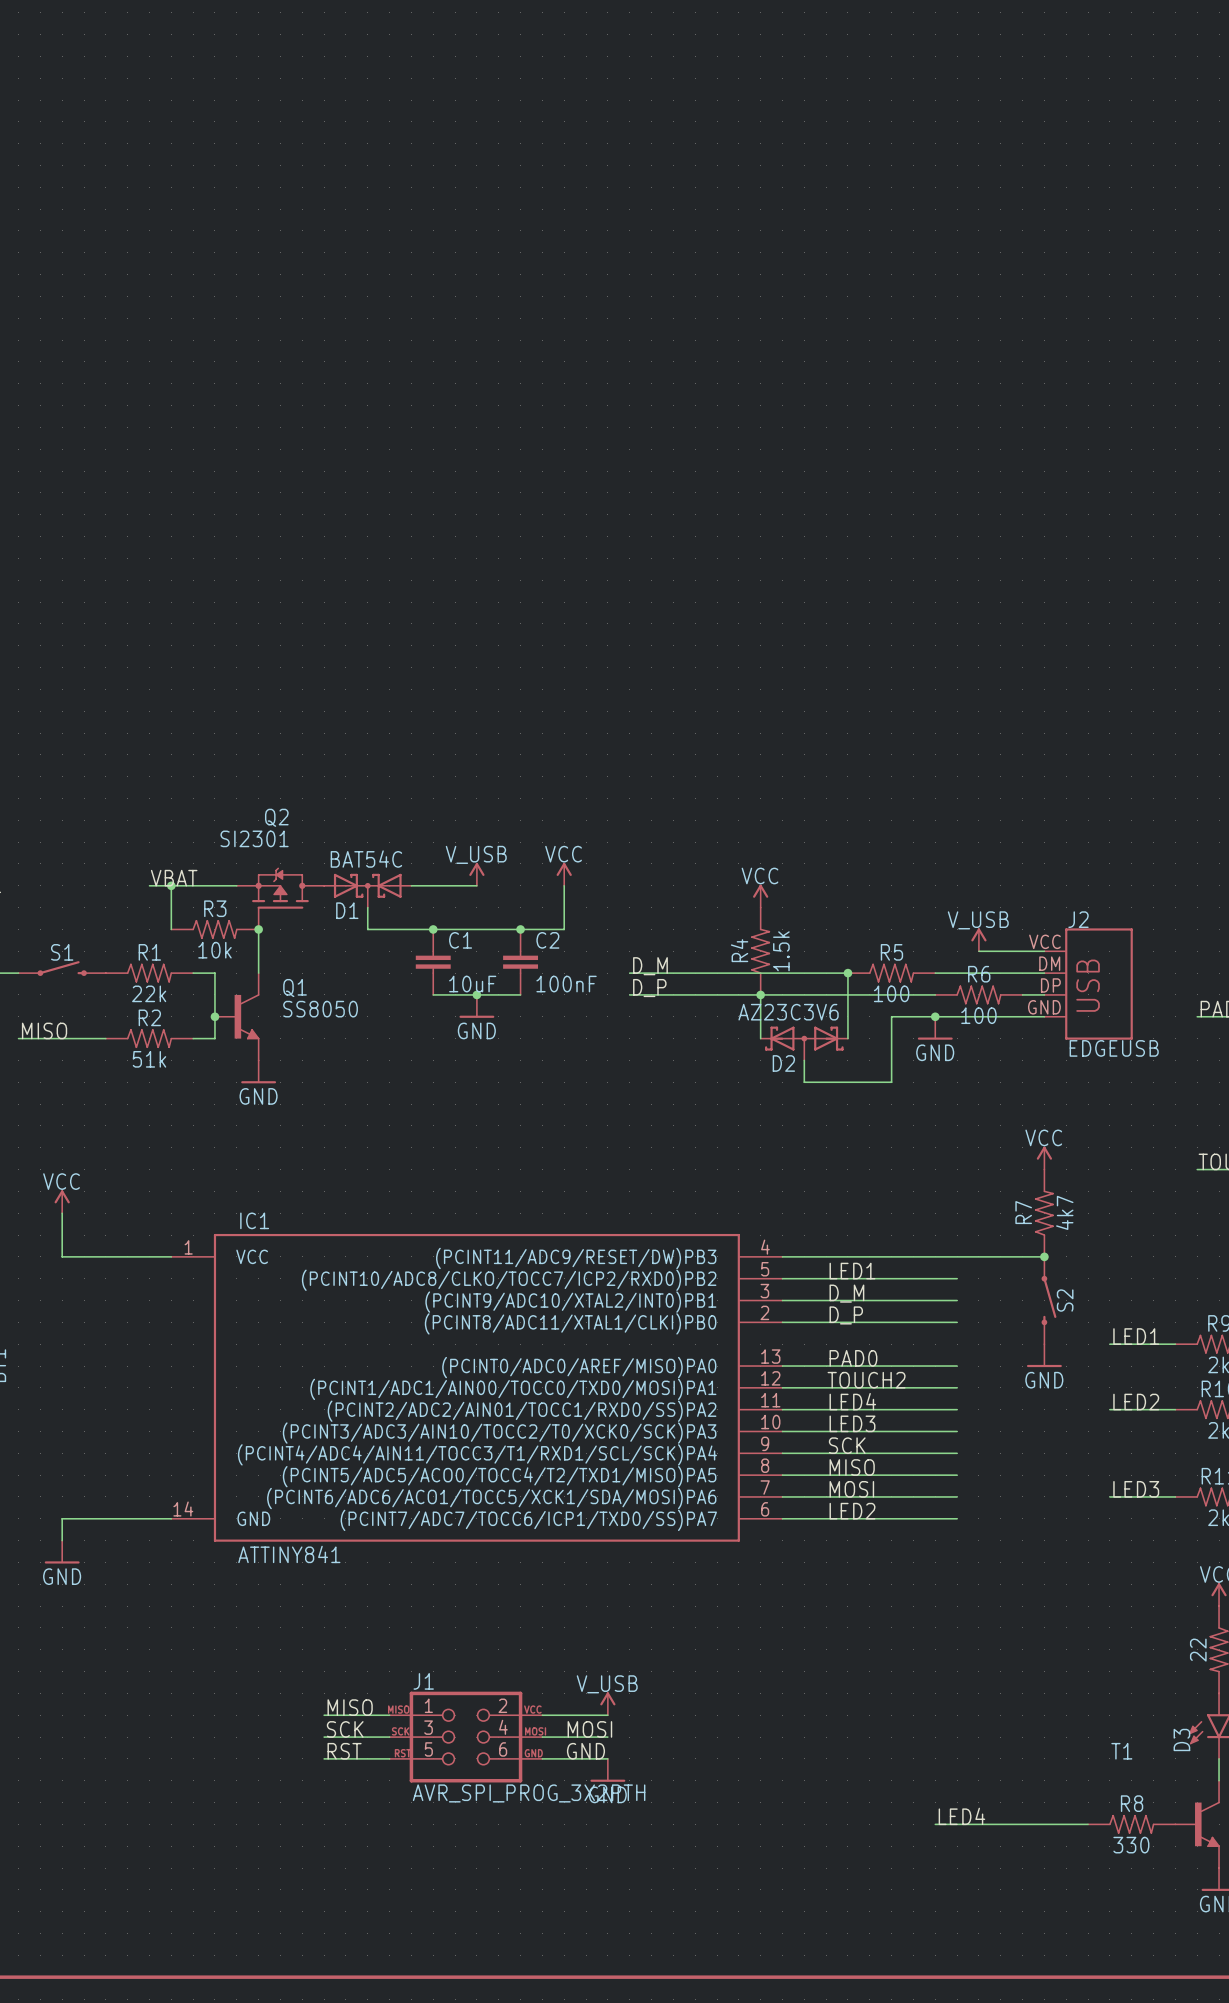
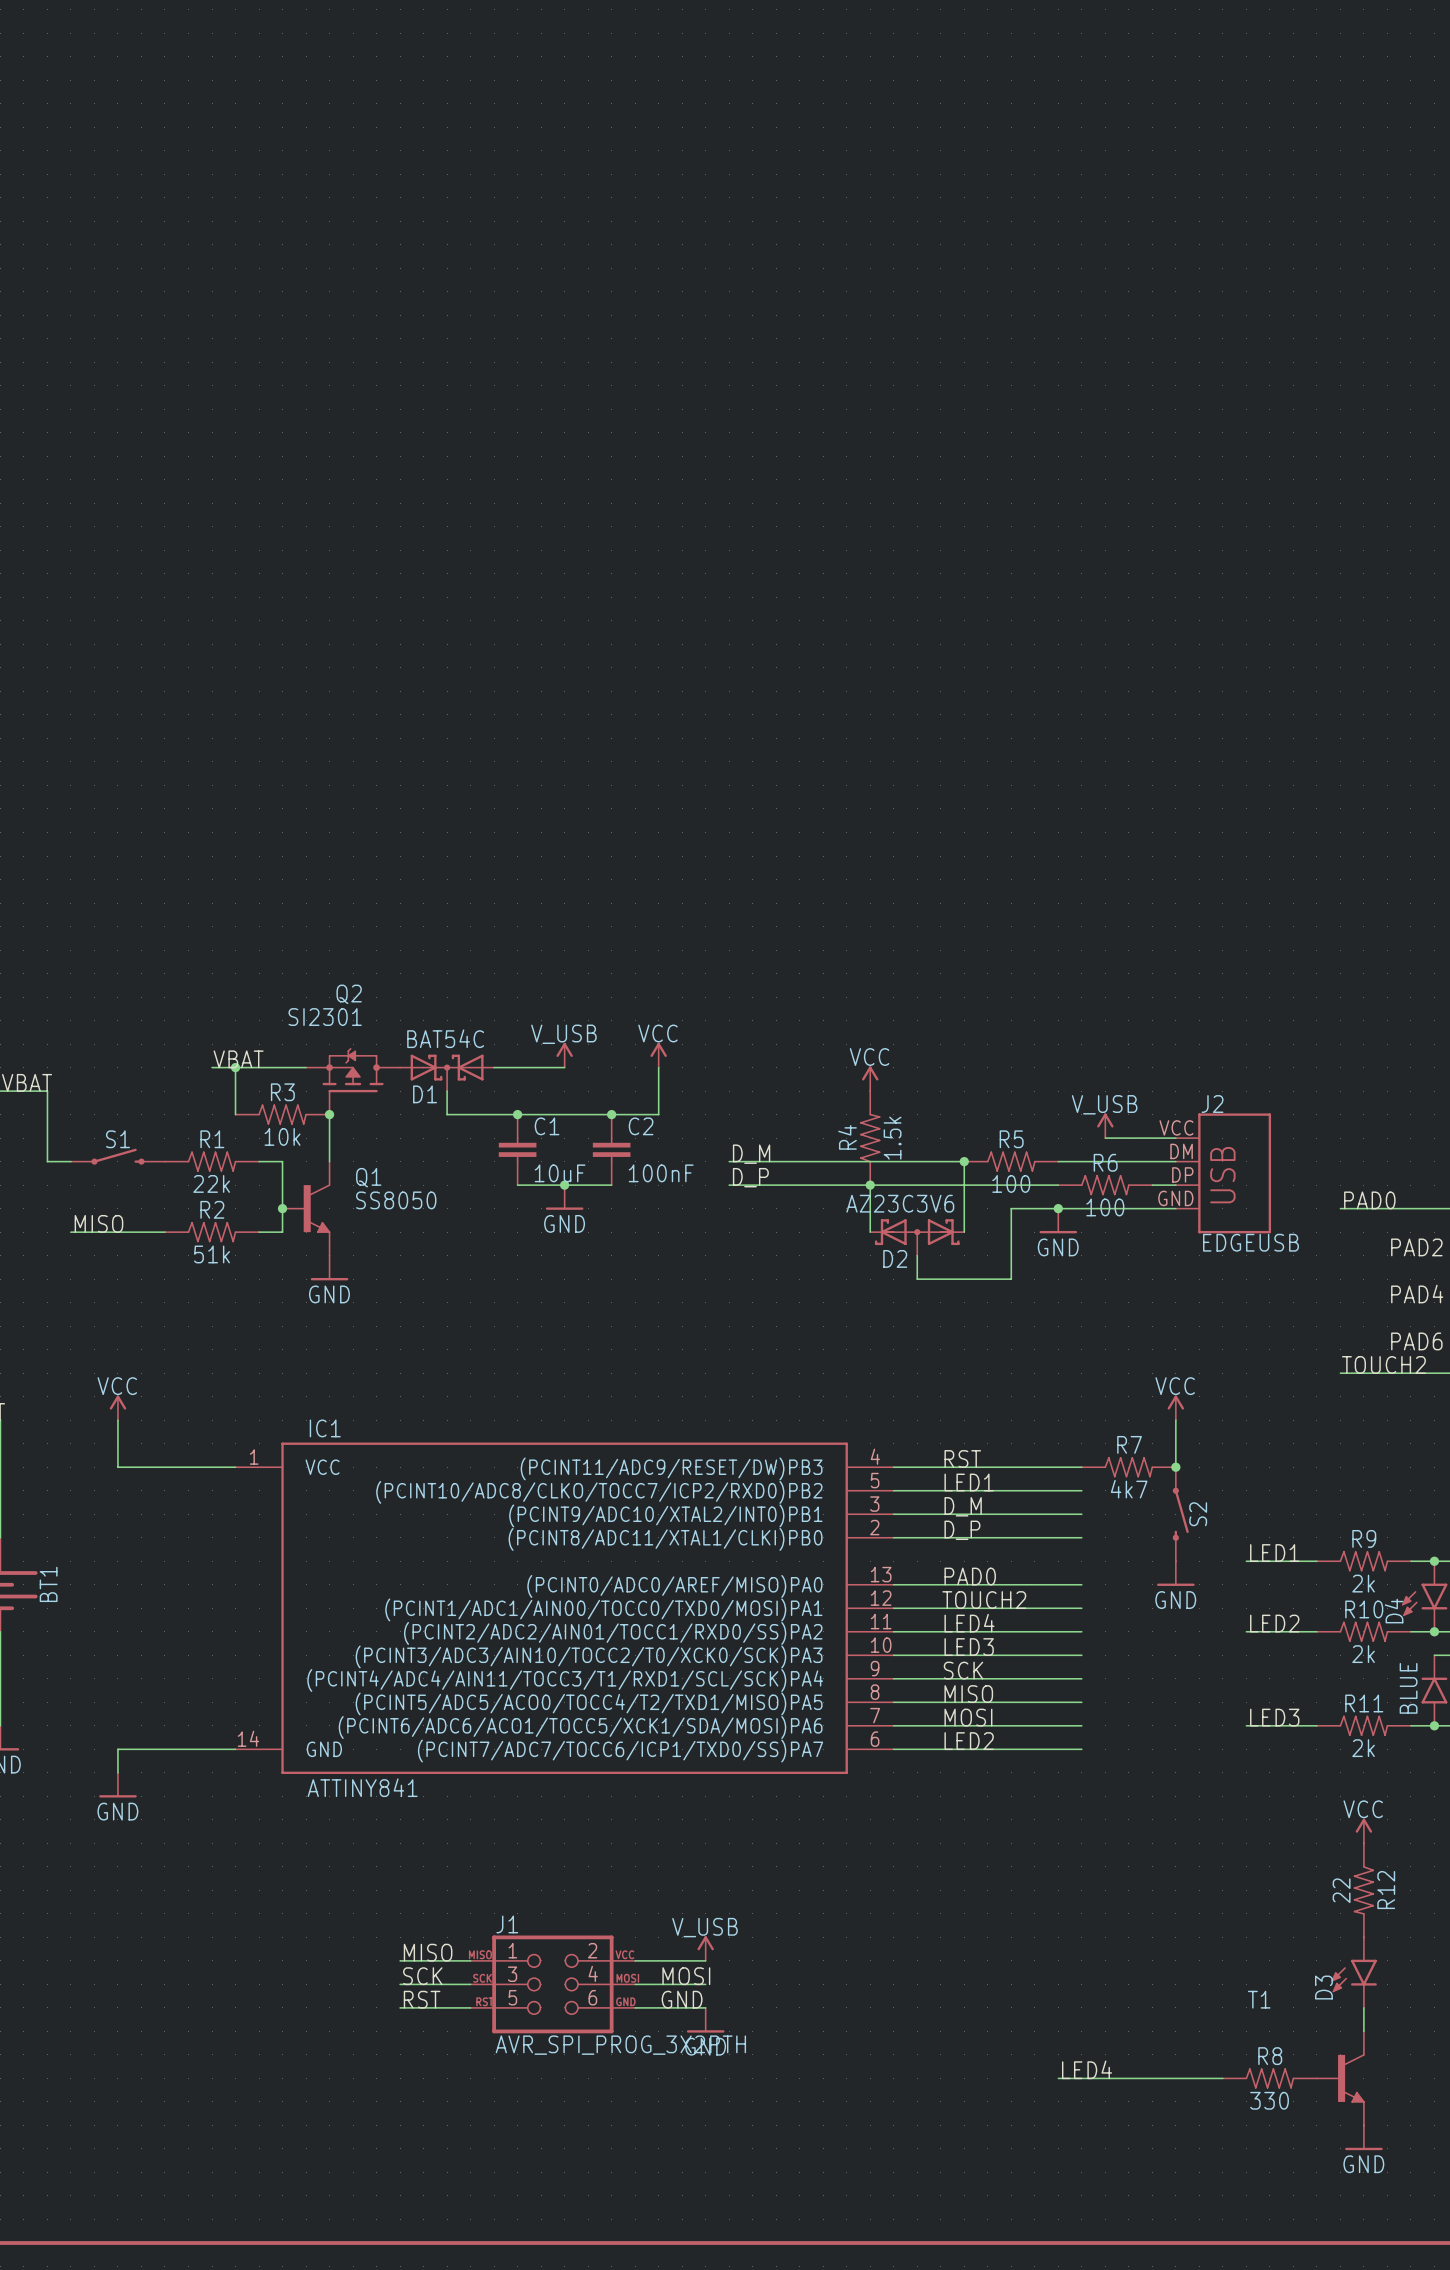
power symbol position: VCC (1044, 1158) -> VCC (1175, 1407)
R7 rotation: 0° (1044, 1213) -> 90° clockwise (1128, 1467)
R7 position: (1044, 1213) -> (1128, 1467)
label: none -> RST (962, 1459)

